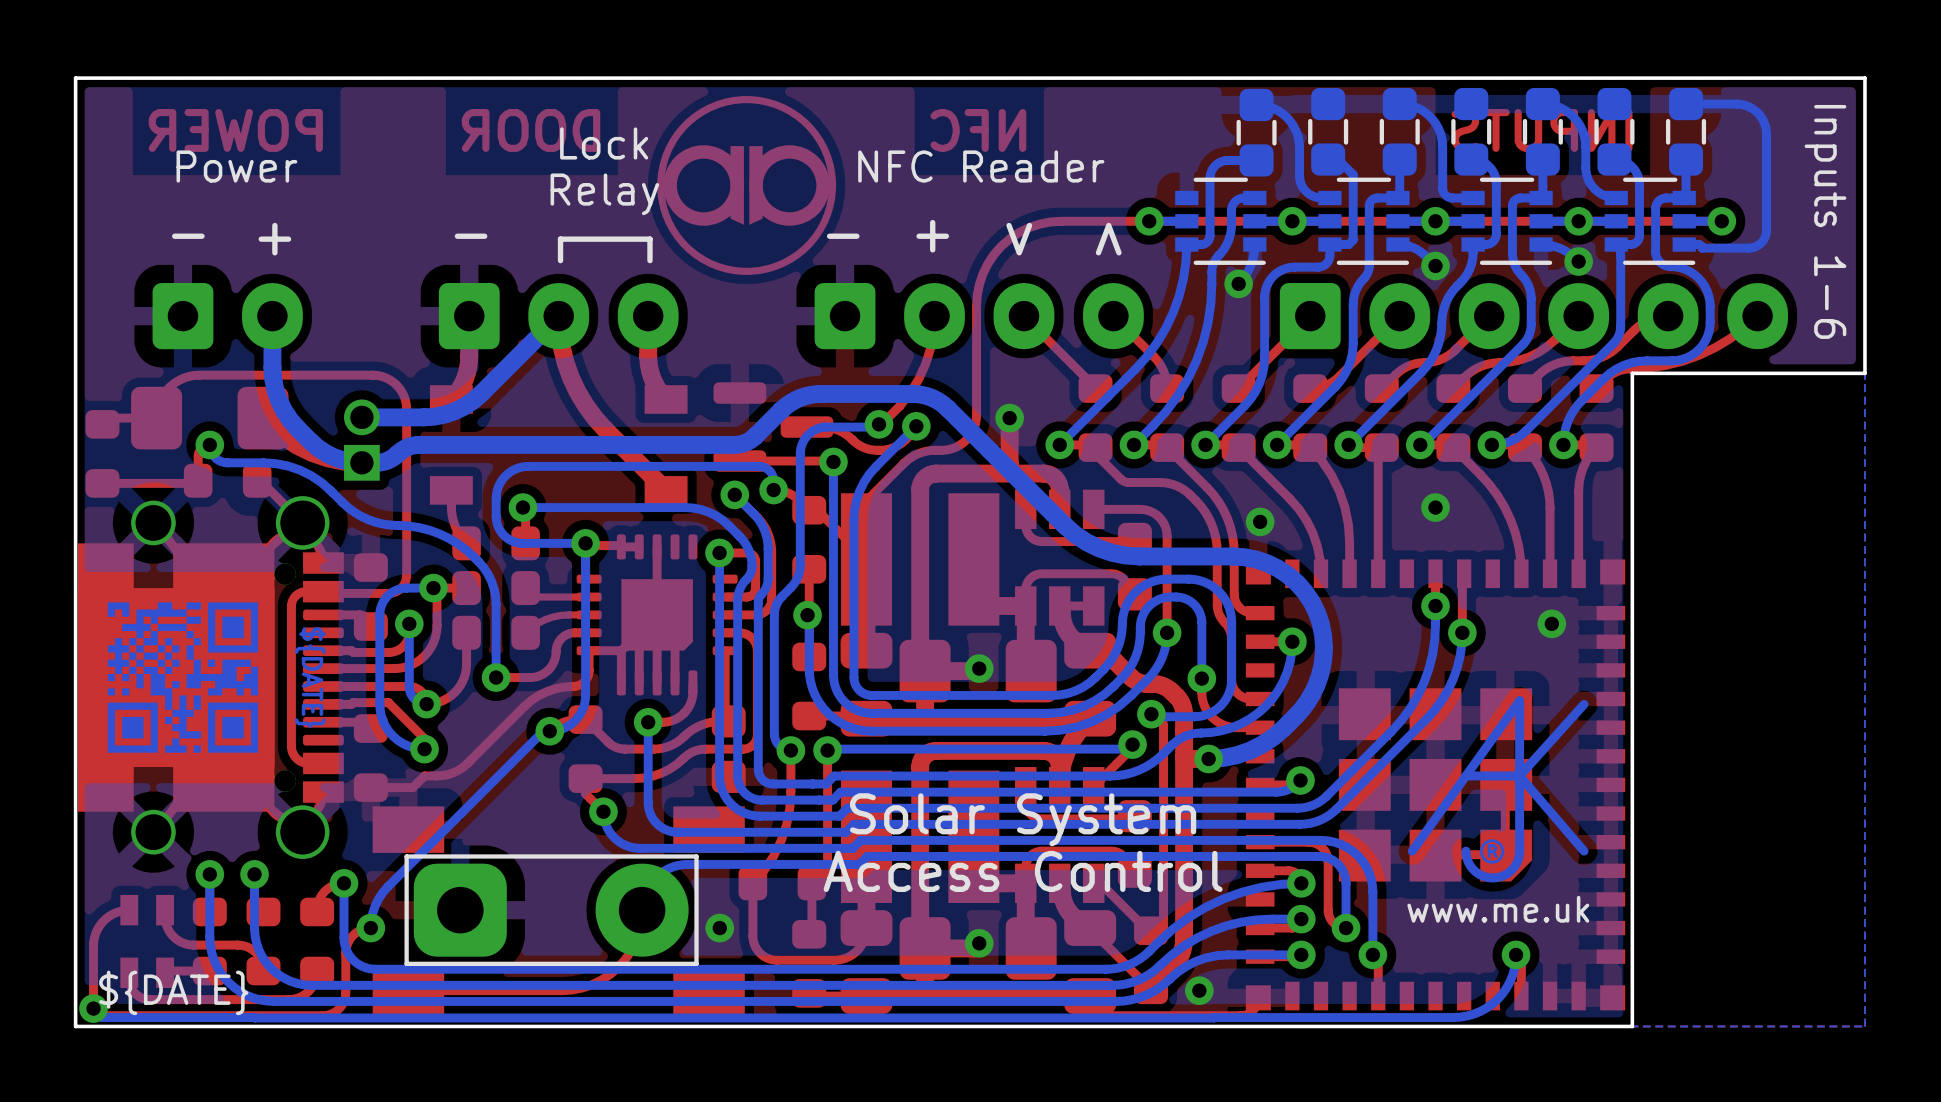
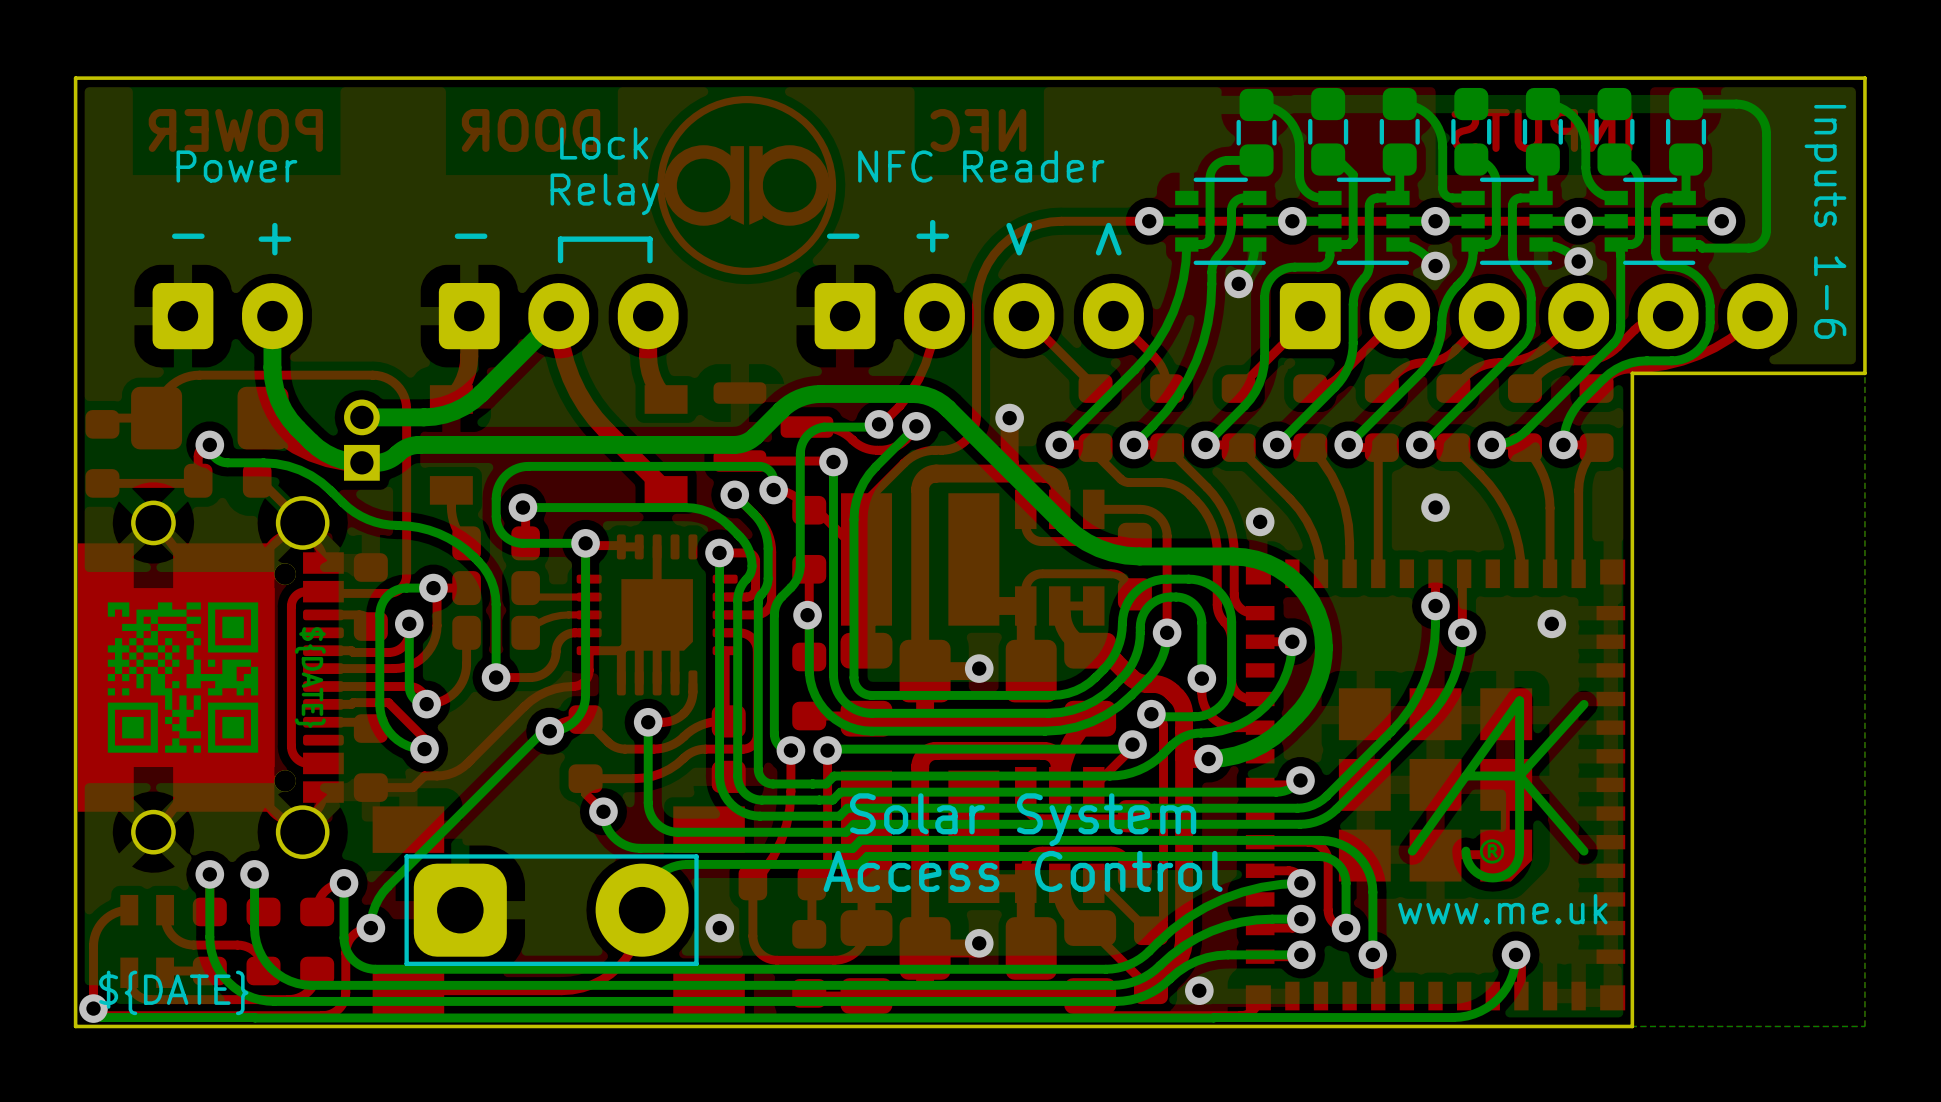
drawing shape: [1407, 696, 1590, 923] -> [1407, 696, 1589, 883]
text: none -> www.me.uk (1502, 909)

